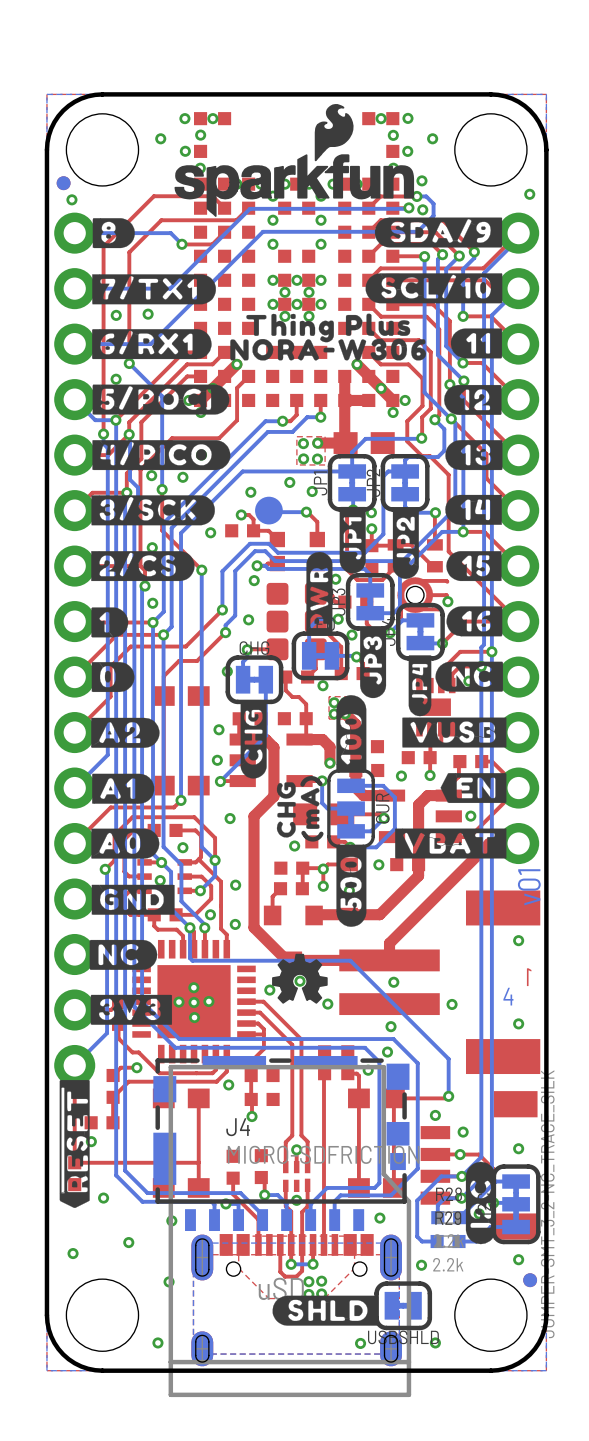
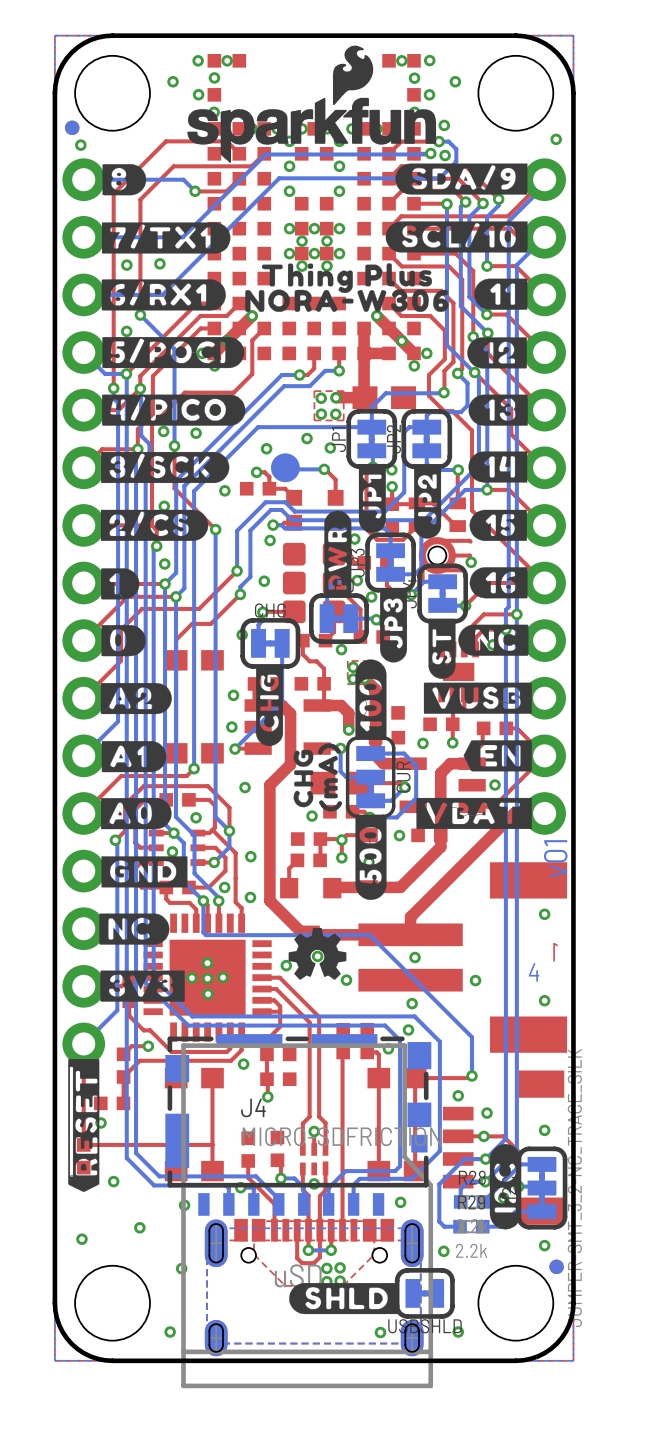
drawing shape: [408, 655, 432, 717] -> [428, 618, 456, 679]

